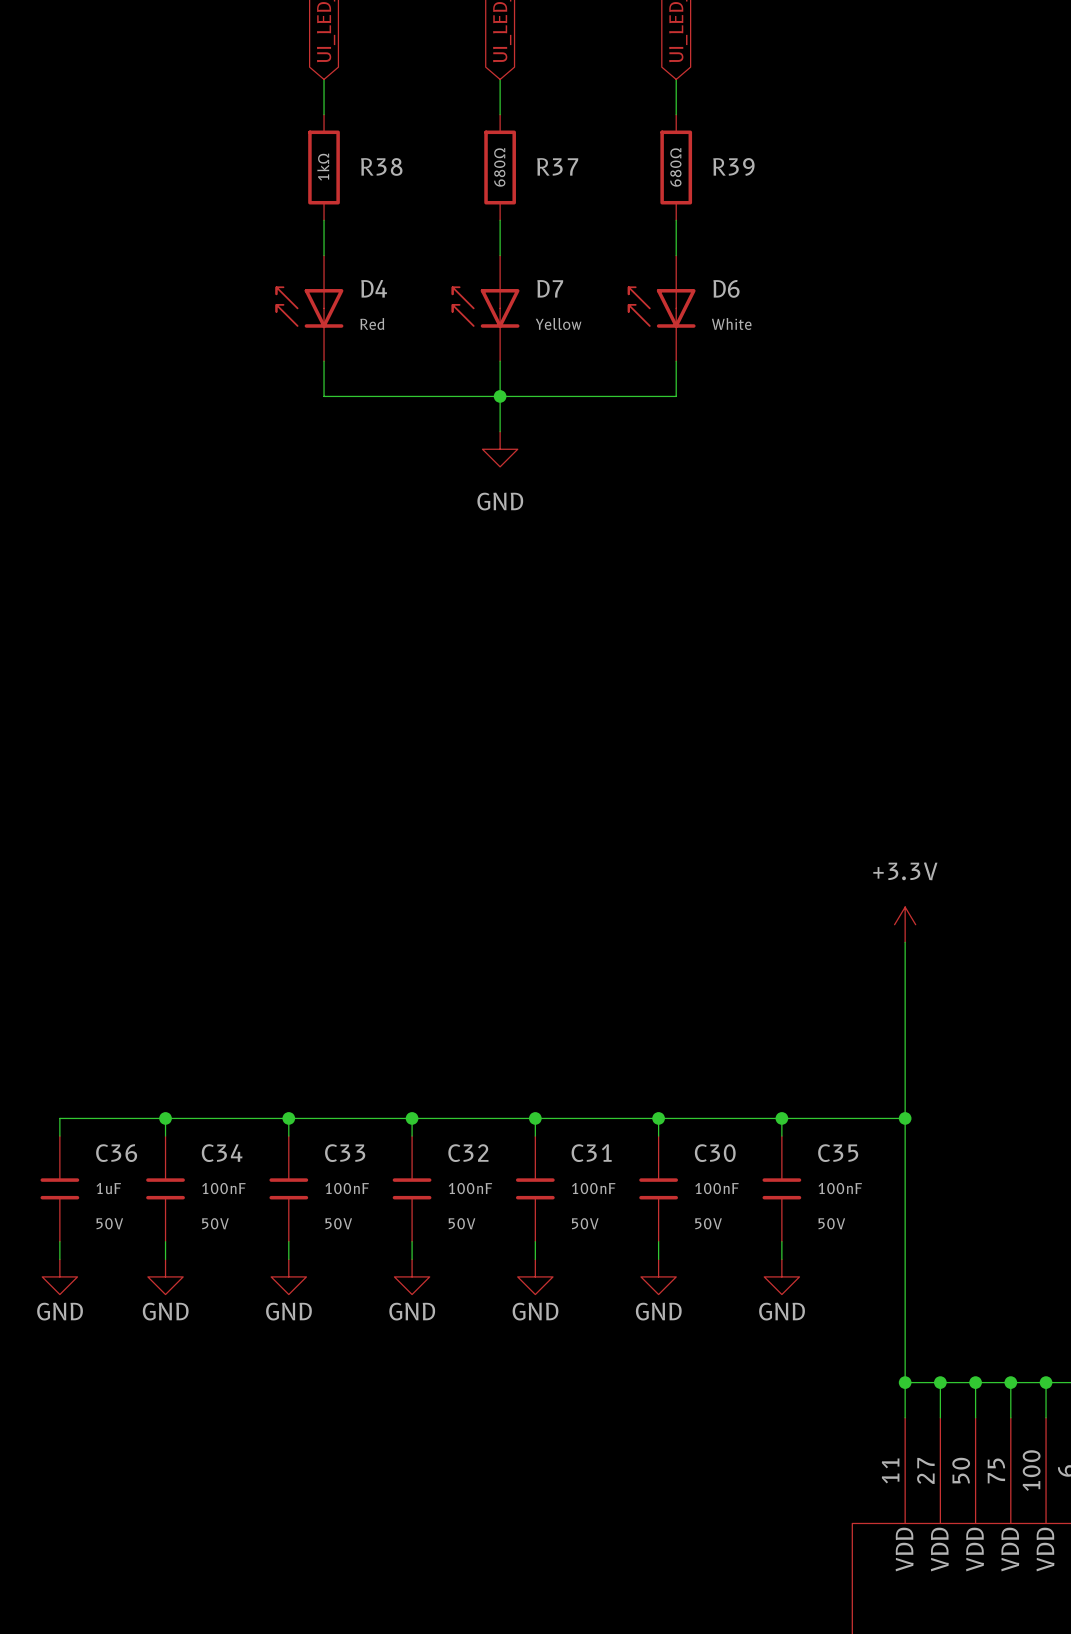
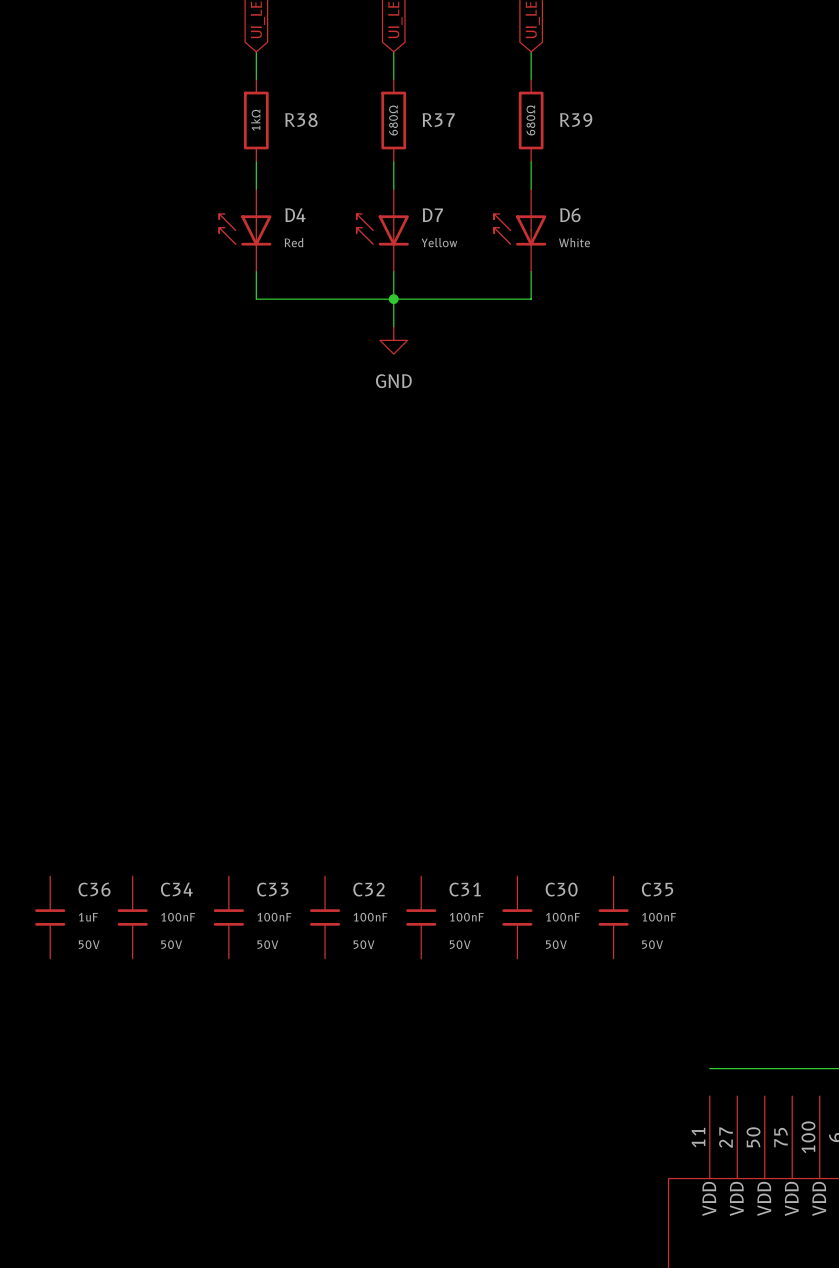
power symbol: +3.3V (905, 924) -> none
wire: (905, 942) (905, 1417) -> none
wire: (165, 1118) (165, 1136) -> none
junction: (165, 1118) -> none
wire: (288, 1118) (288, 1136) -> none
junction: (288, 1118) -> none
wire: (412, 1118) (412, 1136) -> none
junction: (412, 1118) -> none
wire: (535, 1118) (535, 1136) -> none
junction: (535, 1118) -> none
wire: (658, 1118) (658, 1136) -> none
junction: (658, 1118) -> none
wire: (781, 1118) (781, 1136) -> none
junction: (781, 1118) -> none
wire: (905, 1118) (59, 1118) (59, 1136) -> none
junction: (905, 1118) -> none
wire: (59, 1241) (59, 1259) -> none
wire: (165, 1241) (165, 1259) -> none
wire: (288, 1241) (288, 1259) -> none
wire: (412, 1241) (412, 1259) -> none
wire: (535, 1241) (535, 1259) -> none
wire: (658, 1241) (658, 1259) -> none
wire: (781, 1241) (781, 1259) -> none
power symbol: GND (59, 1276) -> none
power symbol: GND (165, 1276) -> none
power symbol: GND (288, 1276) -> none
power symbol: GND (412, 1276) -> none
power symbol: GND (535, 1276) -> none
power symbol: GND (658, 1276) -> none
power symbol: GND (781, 1276) -> none
junction: (905, 1382) -> none
wire: (940, 1382) (940, 1417) -> none
junction: (940, 1382) -> none
wire: (975, 1382) (975, 1417) -> none
junction: (975, 1382) -> none
wire: (1010, 1382) (1010, 1417) -> none
junction: (1010, 1382) -> none
wire: (1046, 1382) (1046, 1417) -> none
junction: (1046, 1382) -> none

